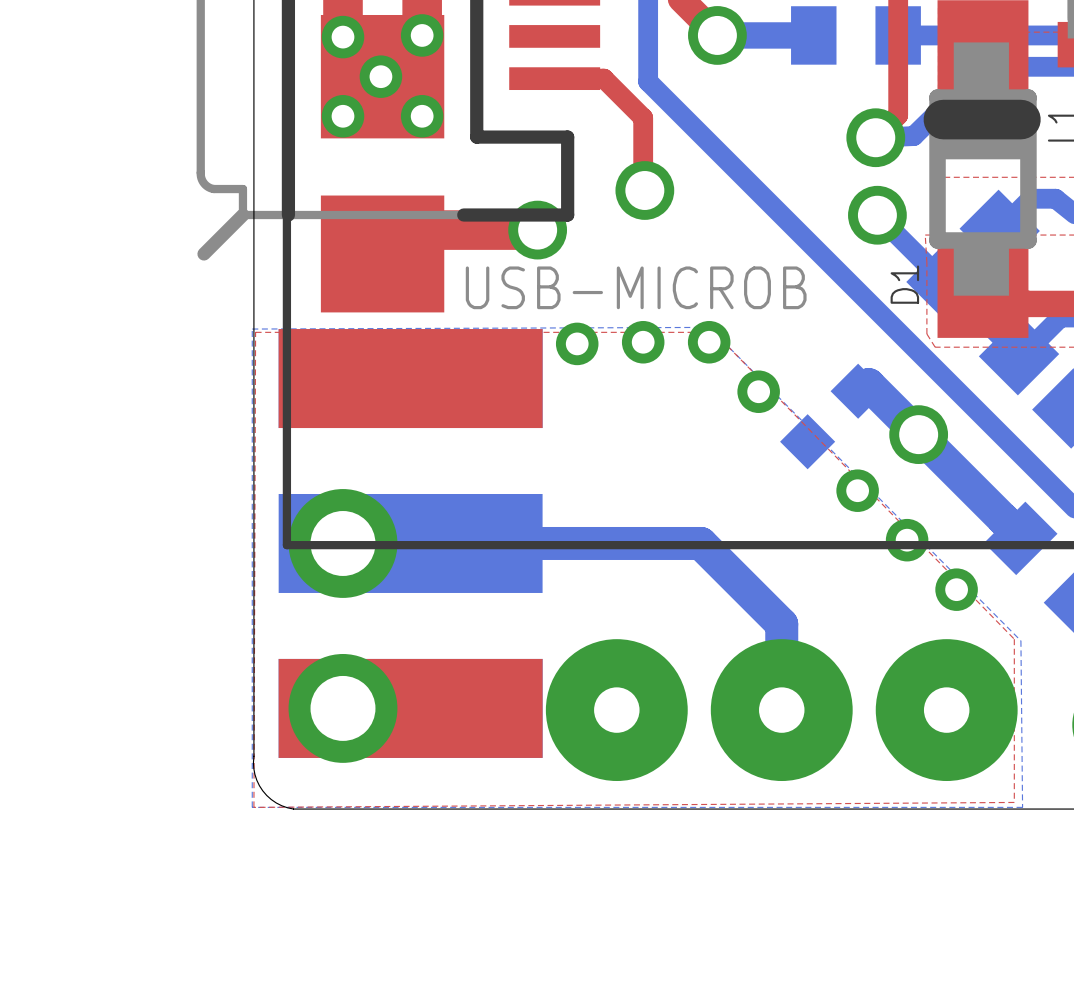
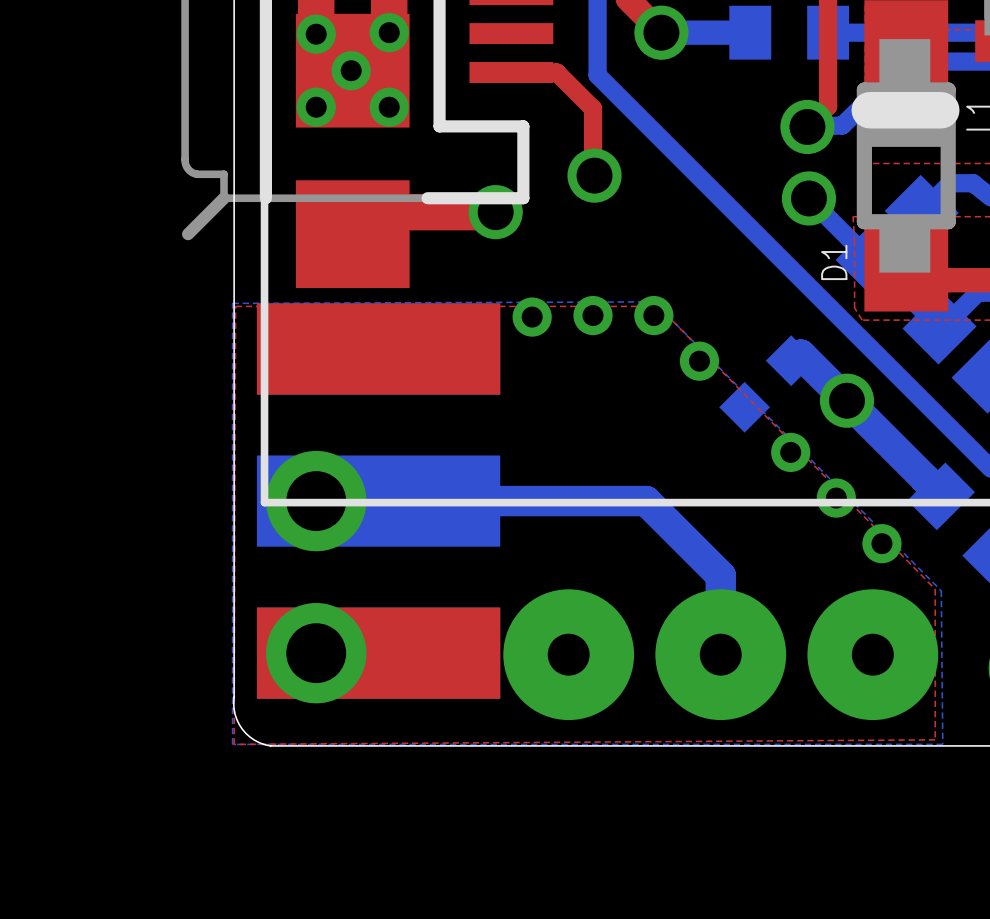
part value: USB-MICROB (636, 287) -> none

